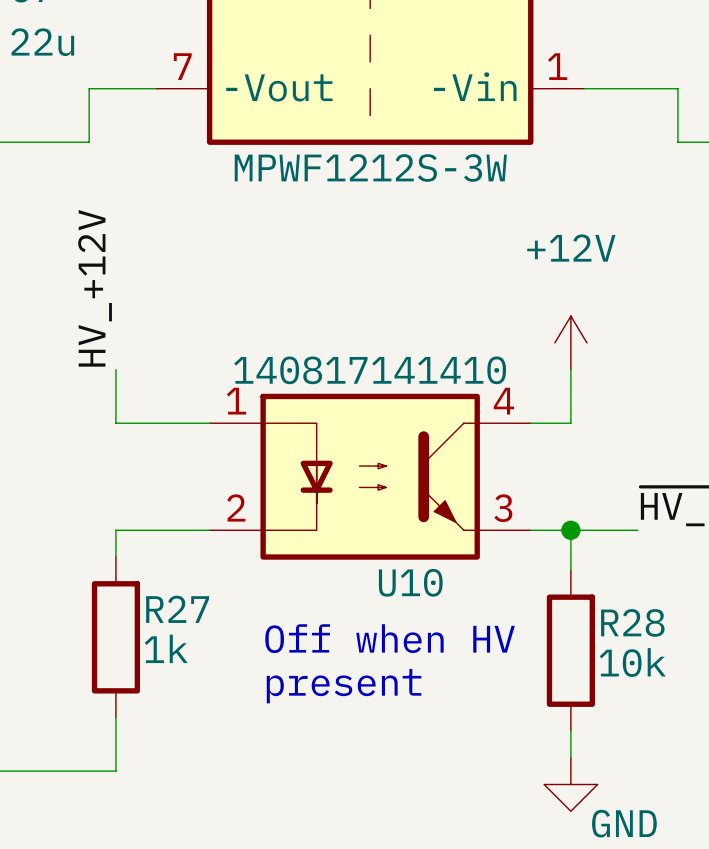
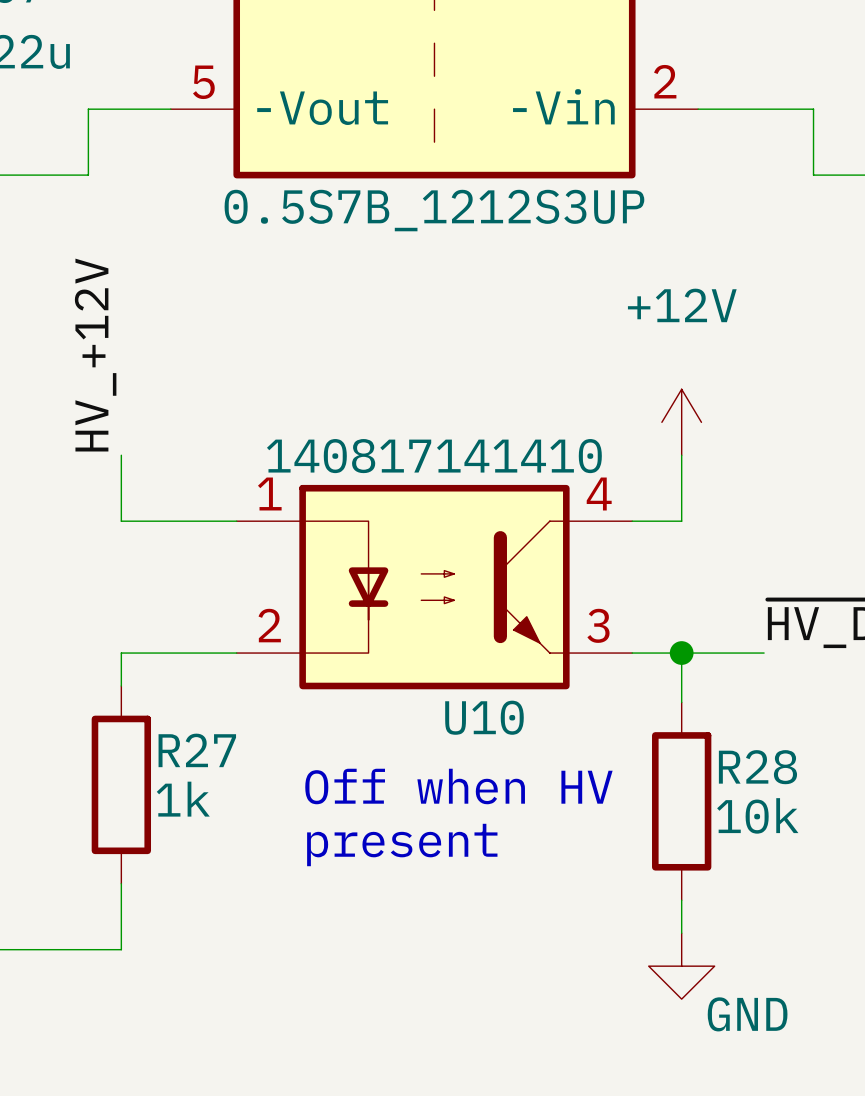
part pin number: 7 (182, 66) -> 5 (203, 82)
part pin number: 1 (557, 66) -> 2 (665, 81)
part value: MPWF1212S-3W (370, 167) -> 0.5S7B_1212S3UP (434, 210)

